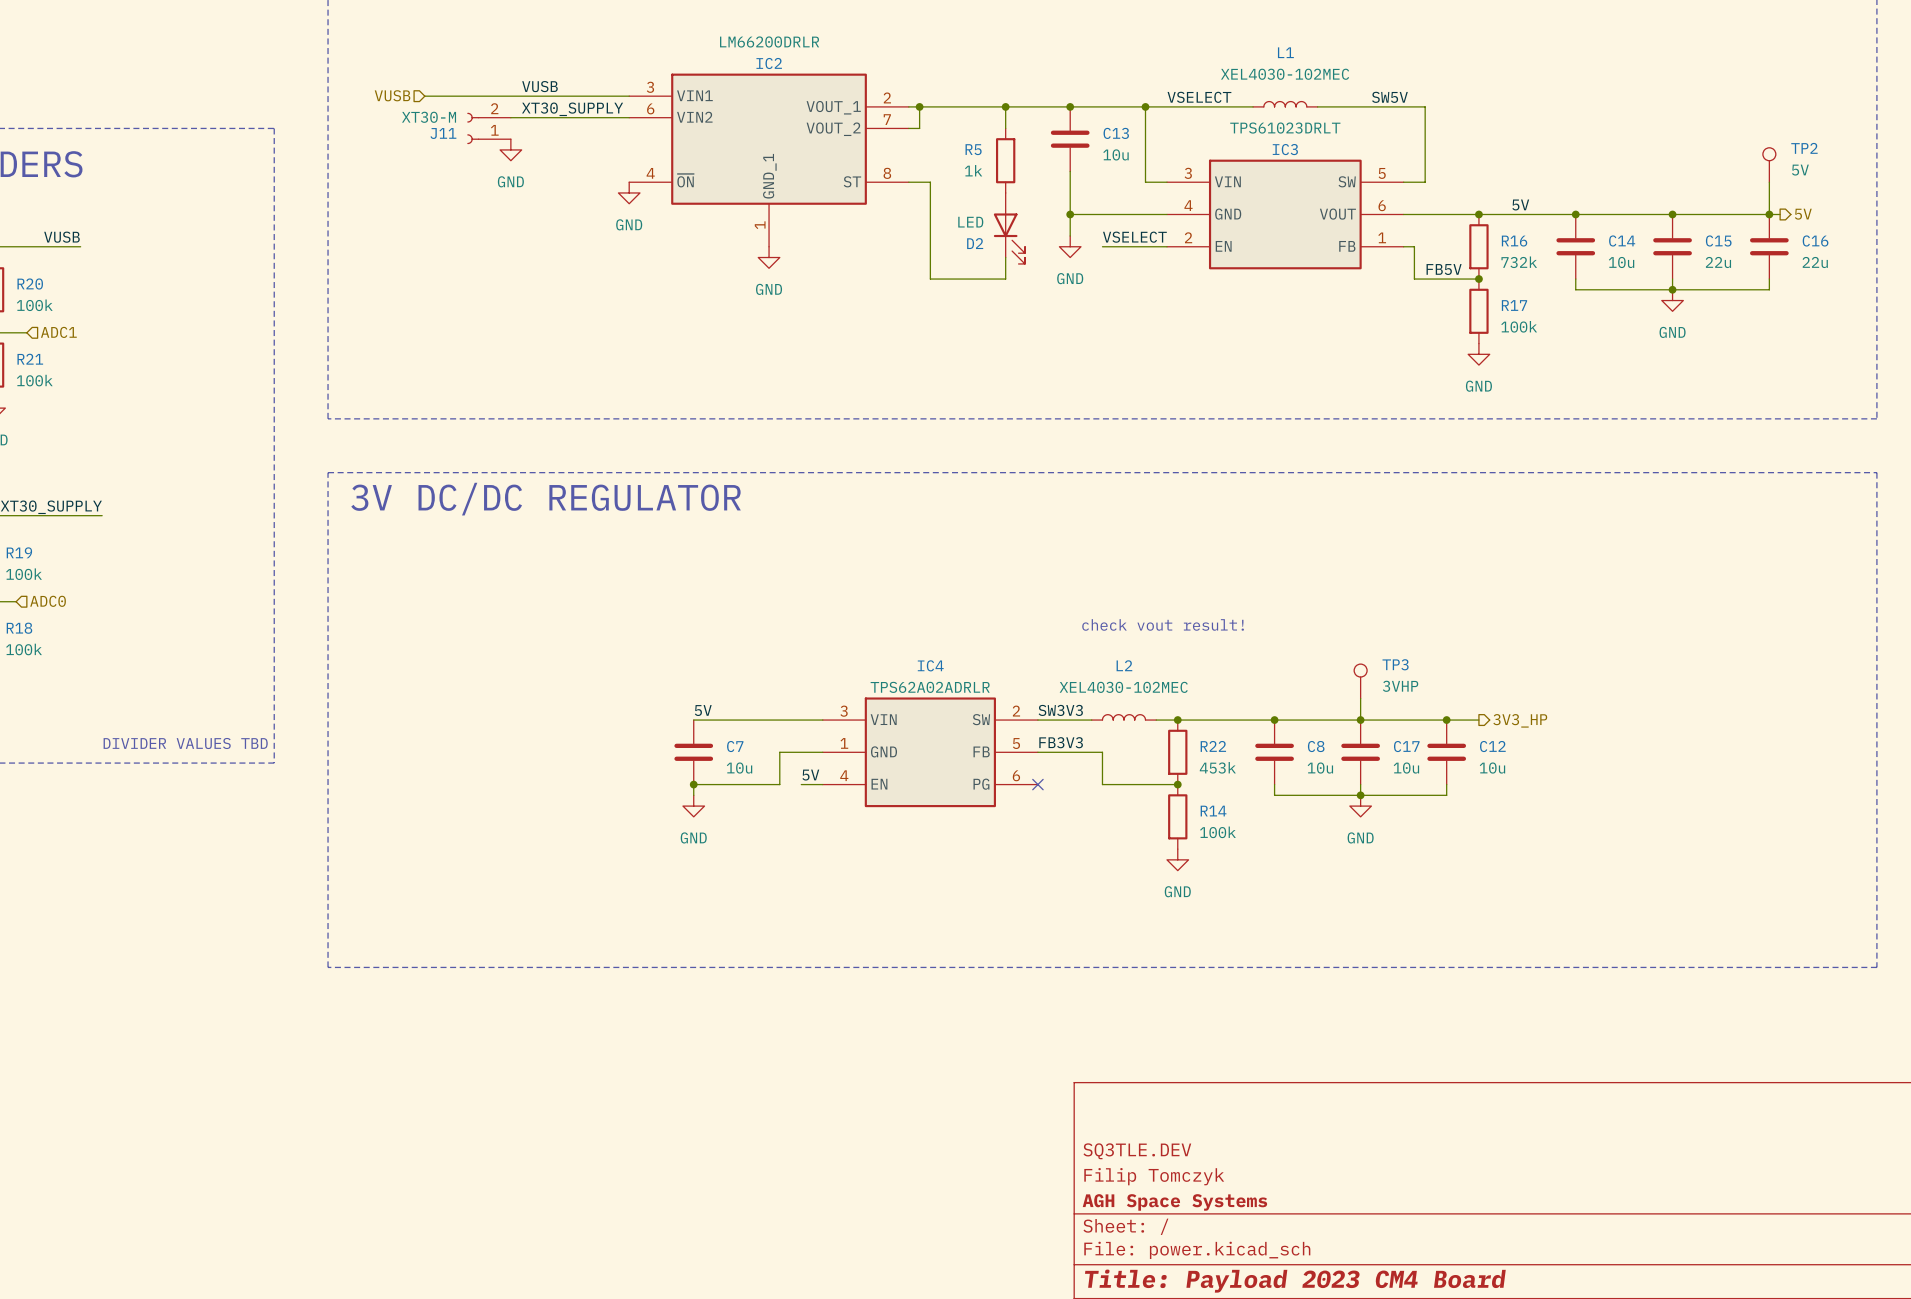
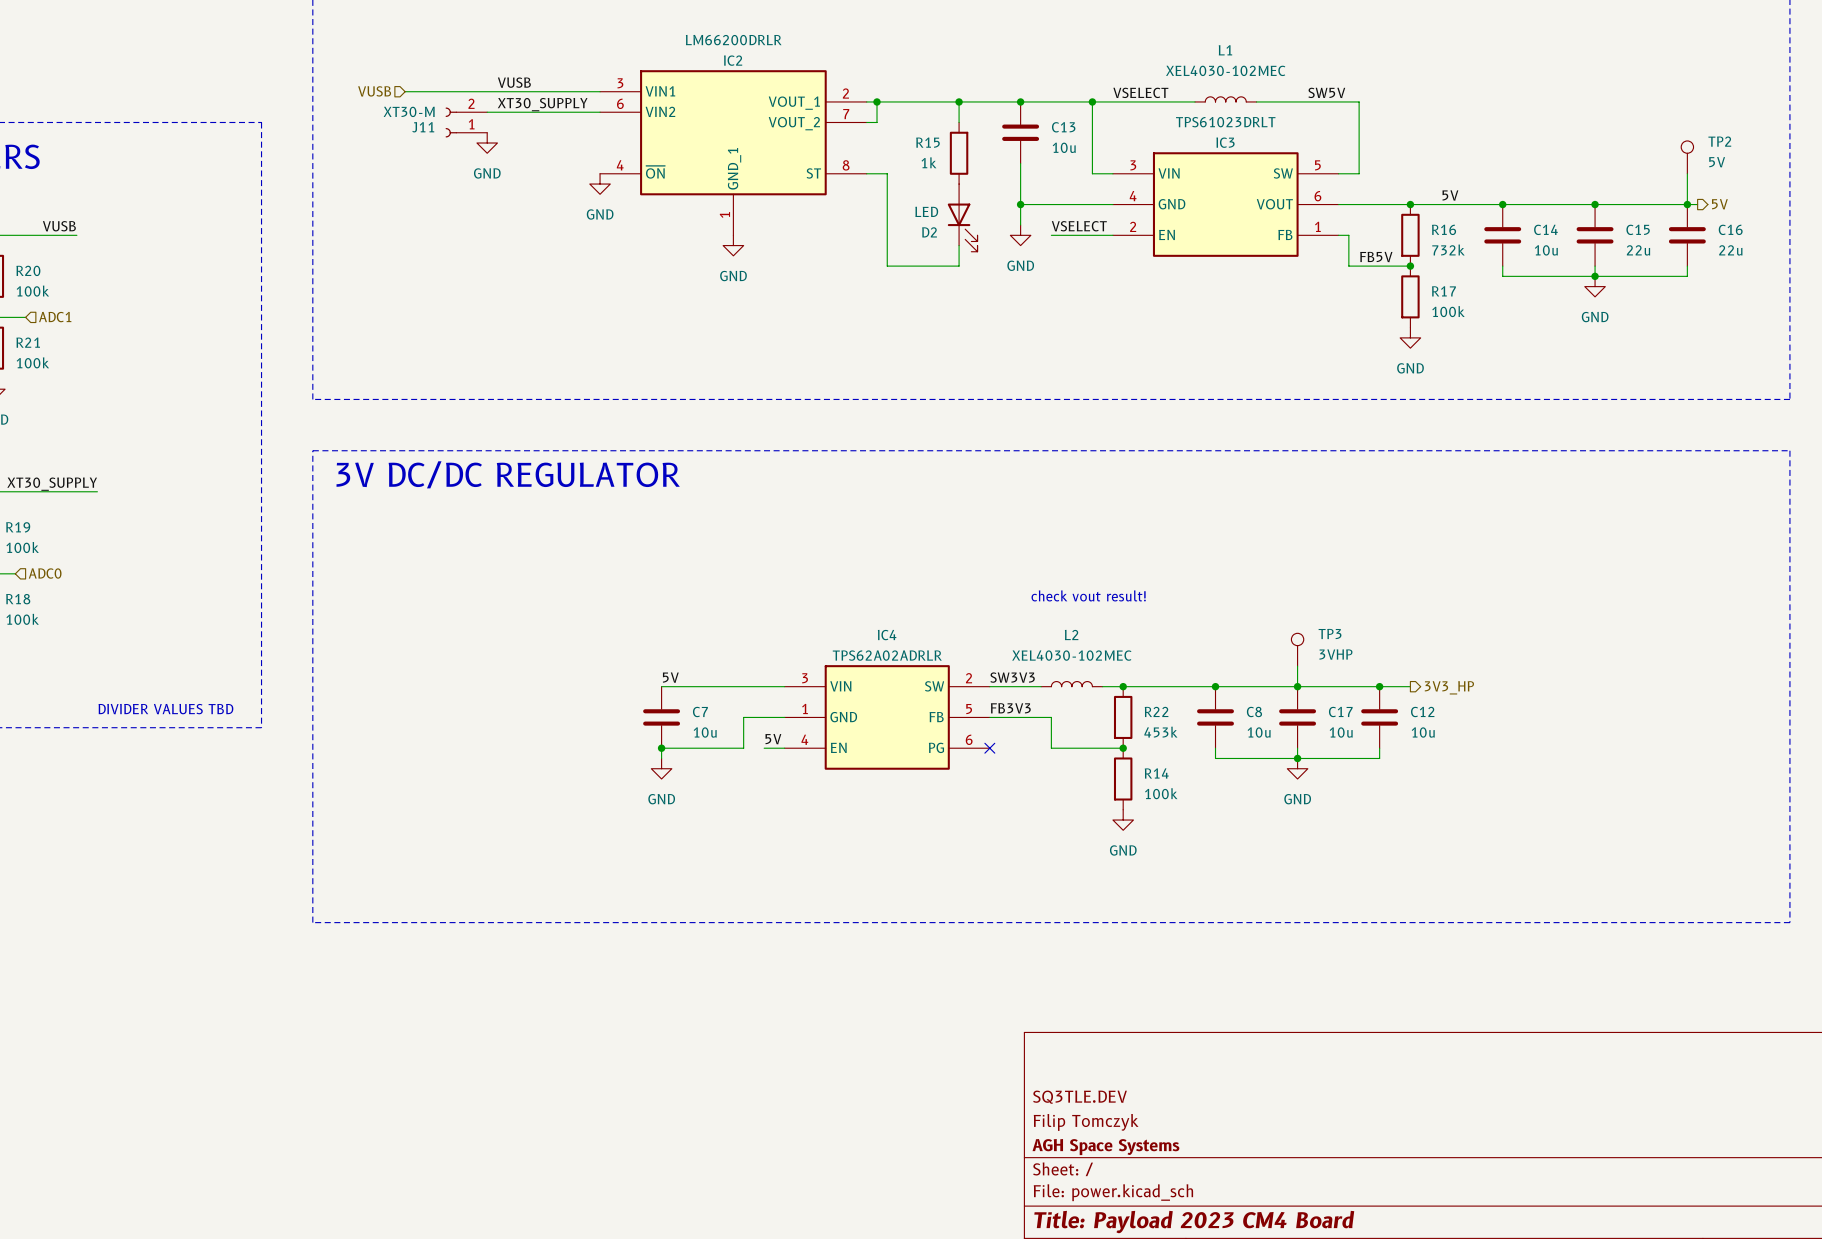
R5 name: R5 (973, 149) -> R15 (927, 142)

